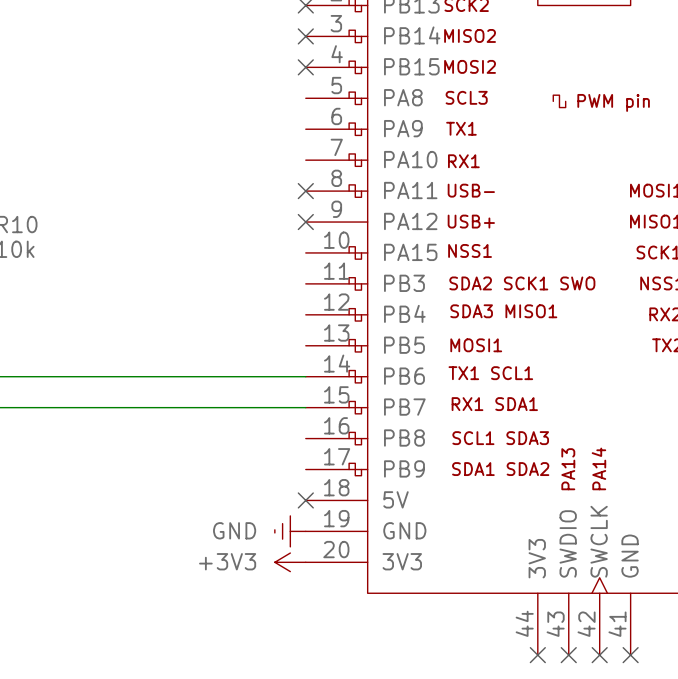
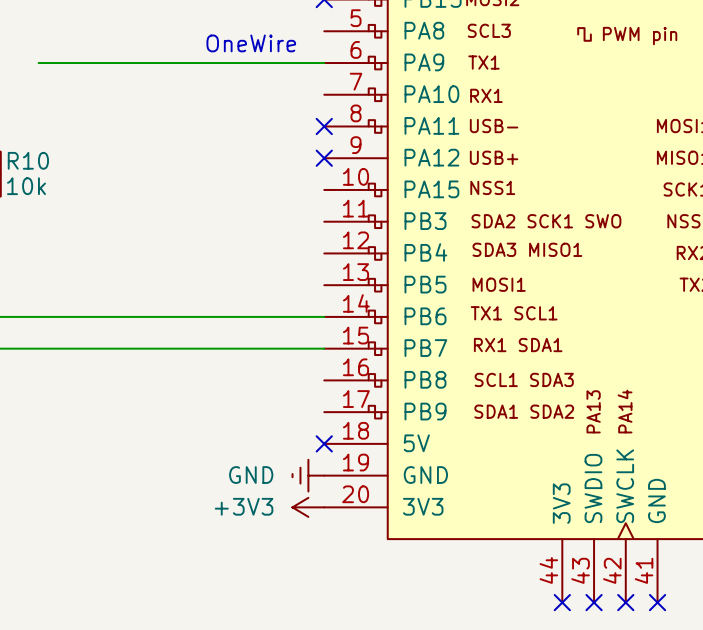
text: none -> OneWire (251, 43)
wire: none -> (38, 63) (324, 63)

